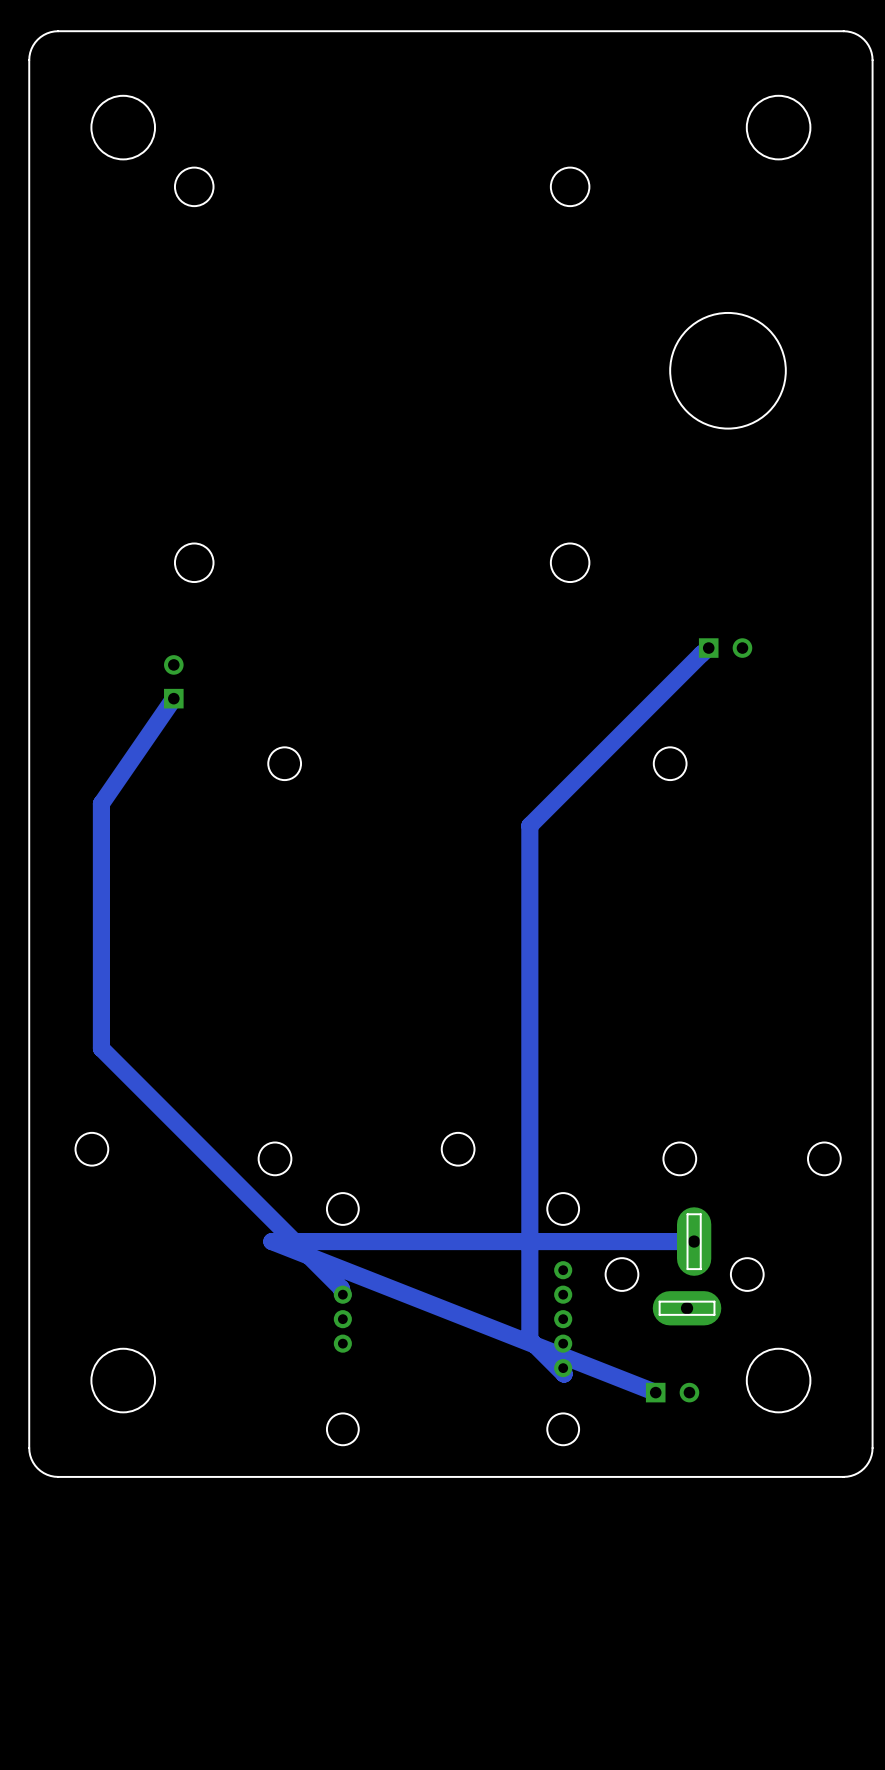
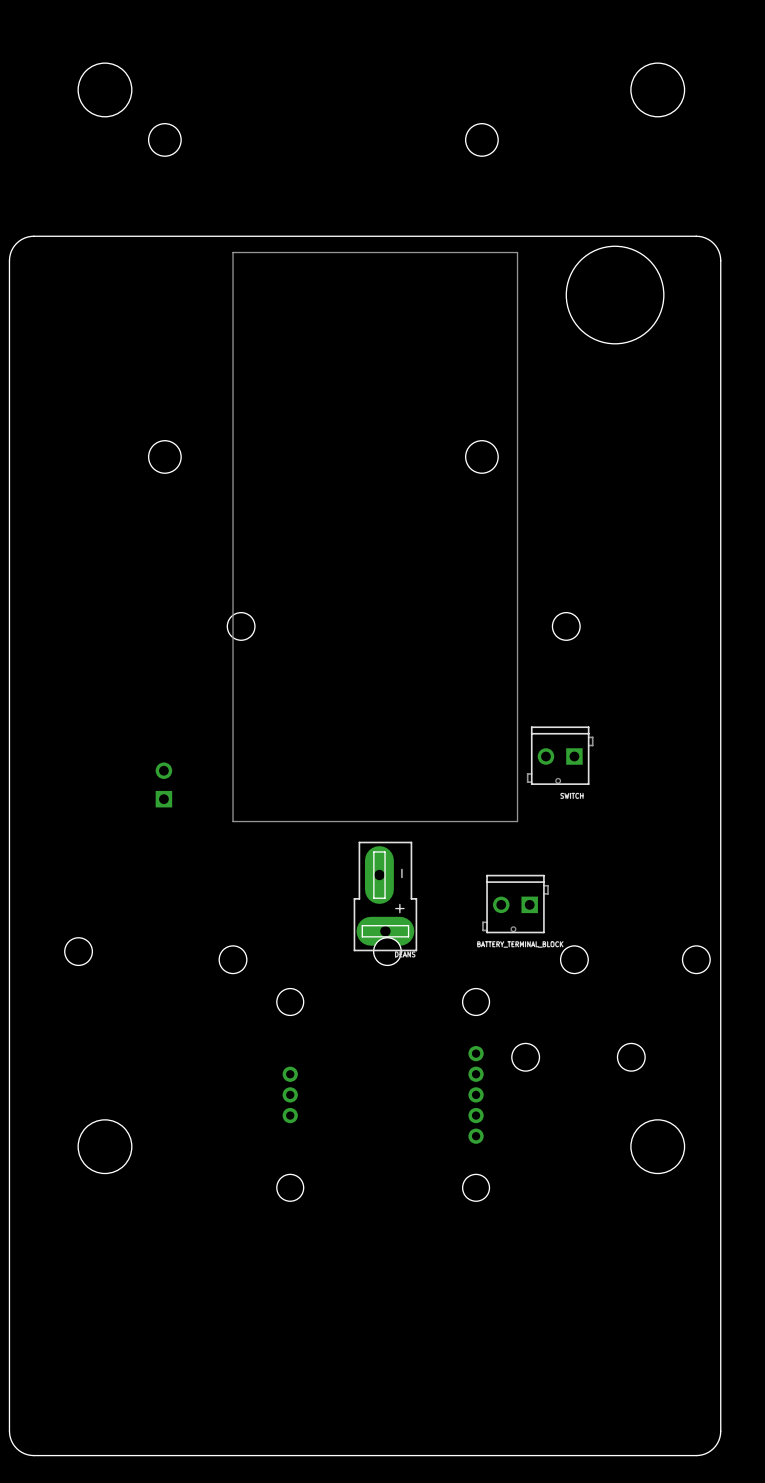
board edge: (843, 31) (58, 31) (43, 35) (33, 45) (29, 60) (29, 1448) (33, 1462) (43, 1473) (58, 1476) (843, 1476) (858, 1473) (868, 1462) (872, 1448) (872, 60) (870, 49) (864, 39) (854, 33) (843, 31) -> (696, 236) (33, 236) (21, 239) (12, 248) (9, 260) (9, 1431) (12, 1443) (21, 1452) (33, 1455) (696, 1455) (708, 1452) (717, 1443) (720, 1431) (720, 260) (718, 251) (713, 243) (705, 238) (696, 236)
line: none -> (517, 252) (517, 821) (233, 821) (233, 252) (517, 252)
track: (708, 648) (529, 825) (529, 1339) (564, 1374) (563, 1368) -> none
part: (725, 648) -> none
part: (173, 681) -> none
track: (173, 698) (101, 803) (101, 1048) (341, 1288) (342, 1294) -> none
part: none -> (560, 755)
part: none -> (163, 784)
part: none -> (385, 896)
part: none -> (515, 904)
track: (694, 1241) (271, 1241) (655, 1392) -> none
part: (687, 1266) -> none
part: (672, 1392) -> none

